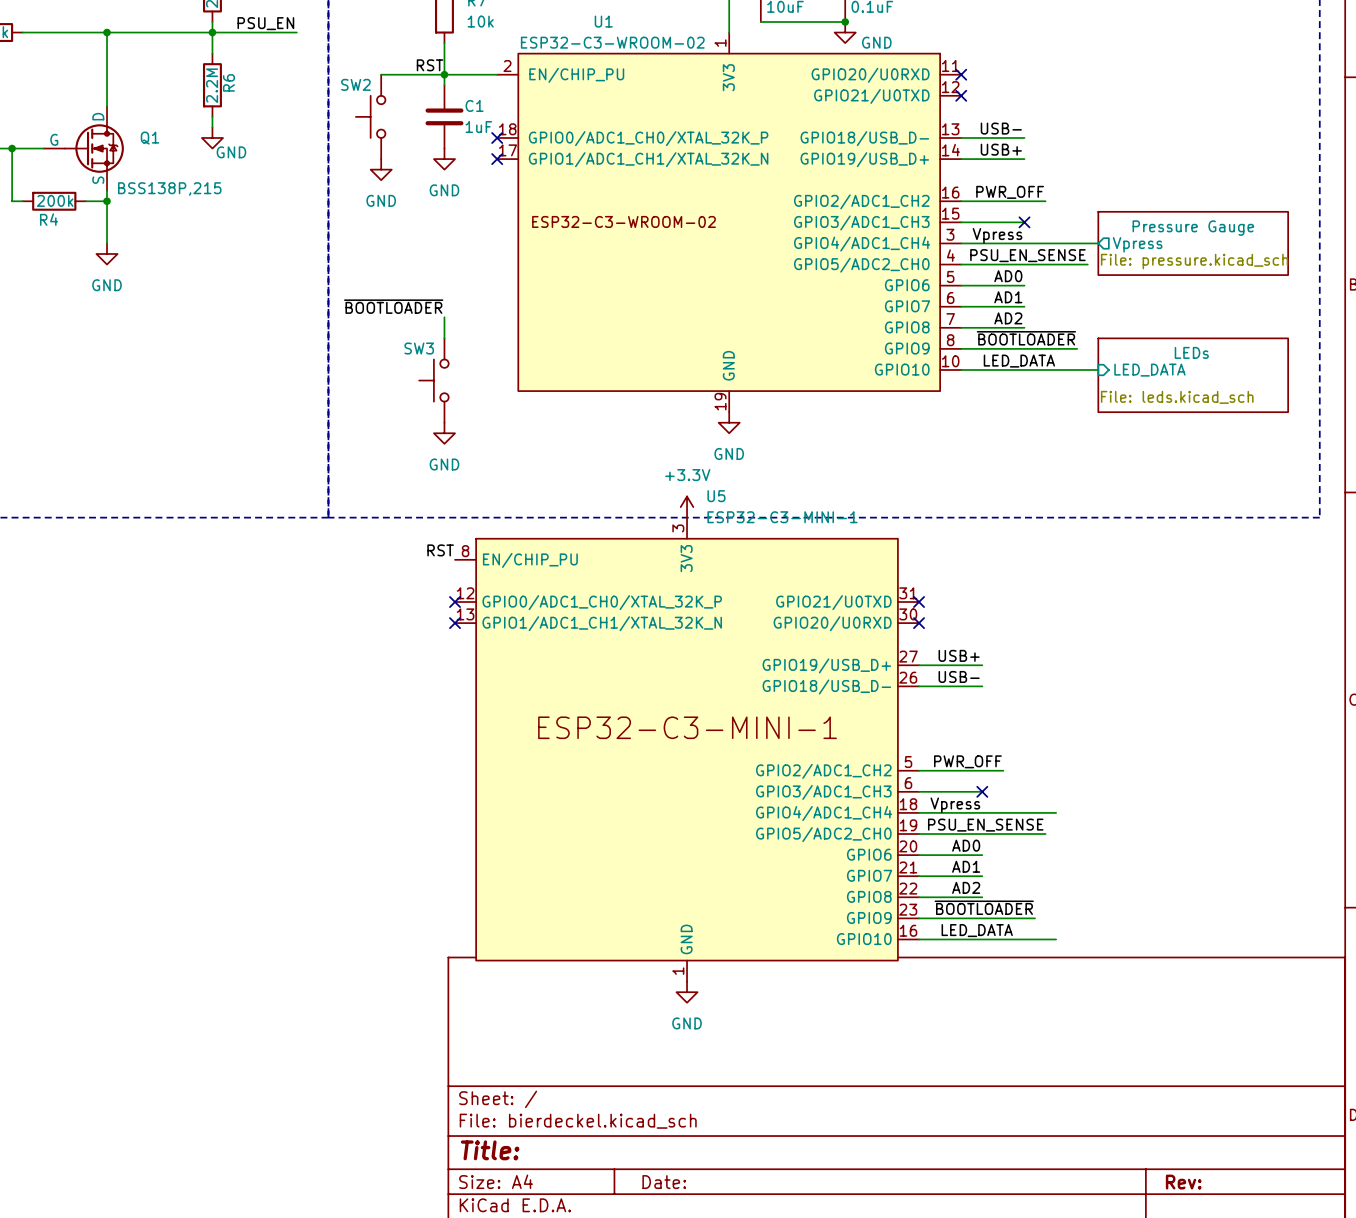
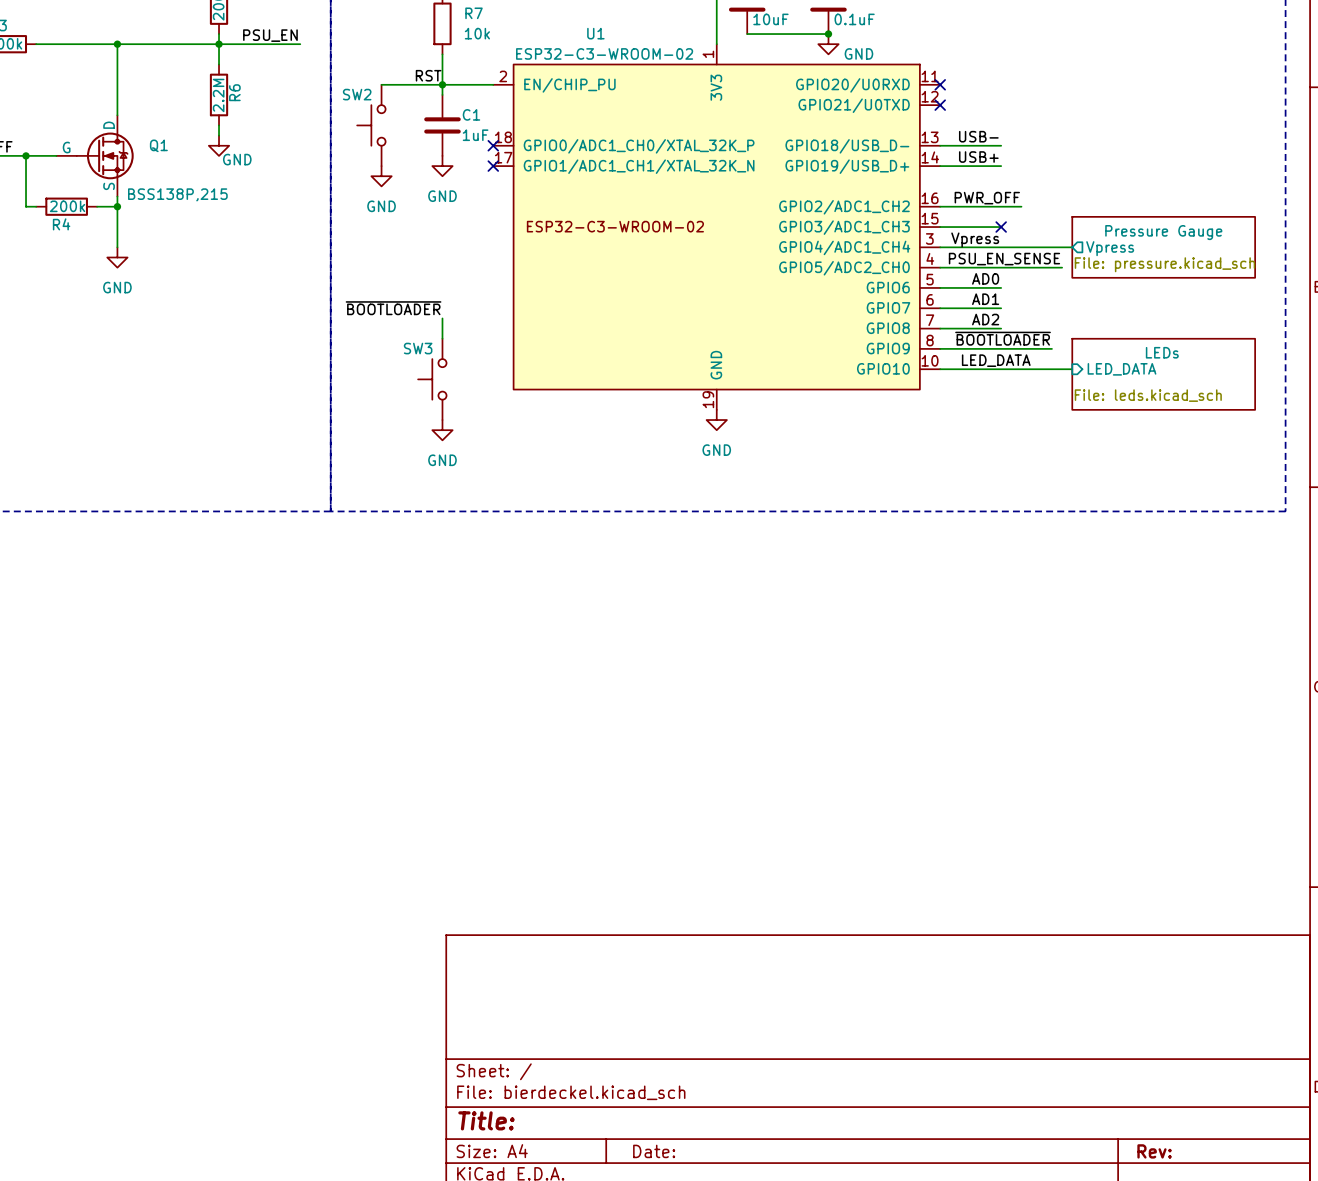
power symbol: +3.3V (687, 507) -> none
label: RST (440, 550) -> none
no-connect mark: (455, 602) -> none
no-connect mark: (919, 602) -> none
no-connect mark: (455, 623) -> none
no-connect mark: (919, 623) -> none
label: USB+ (959, 655) -> none
wire: (919, 665) (982, 665) -> none
label: USB- (959, 676) -> none
wire: (919, 686) (982, 686) -> none
U5: ESP32-C3-MINI-1 (687, 749) -> none
label: PWR_OFF (967, 761) -> none
wire: (919, 770) (1003, 770) -> none
wire: (919, 791) (982, 791) -> none
no-connect mark: (982, 791) -> none
label: Vpress (955, 805) -> none
wire: (919, 812) (1056, 812) -> none
label: PSU_EN_SENSE (985, 825) -> none
wire: (919, 834) (1045, 834) -> none
label: AD0 (966, 845) -> none
wire: (919, 855) (982, 855) -> none
label: AD1 (966, 866) -> none
wire: (919, 876) (982, 876) -> none
label: AD2 (966, 887) -> none
wire: (919, 897) (982, 897) -> none
label: ~{BOOTLOADER} (984, 907) -> none
wire: (919, 918) (1035, 918) -> none
label: LED_DATA (977, 930) -> none
wire: (919, 939) (1056, 939) -> none
power symbol: GND (687, 992) -> none

